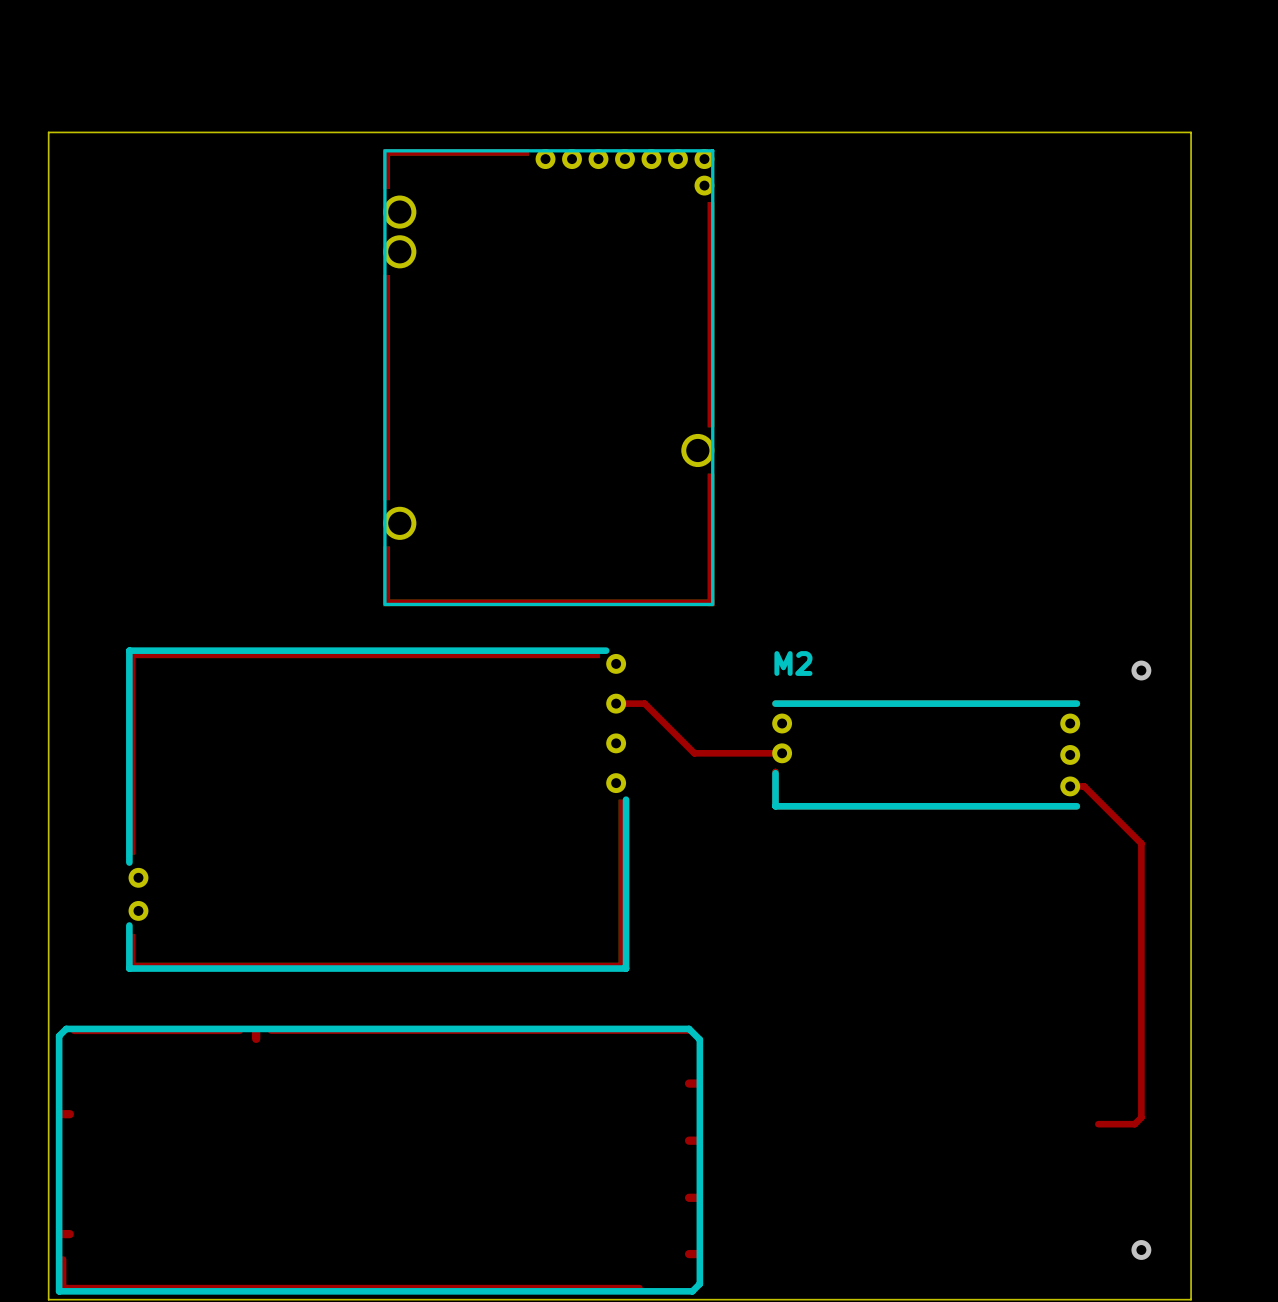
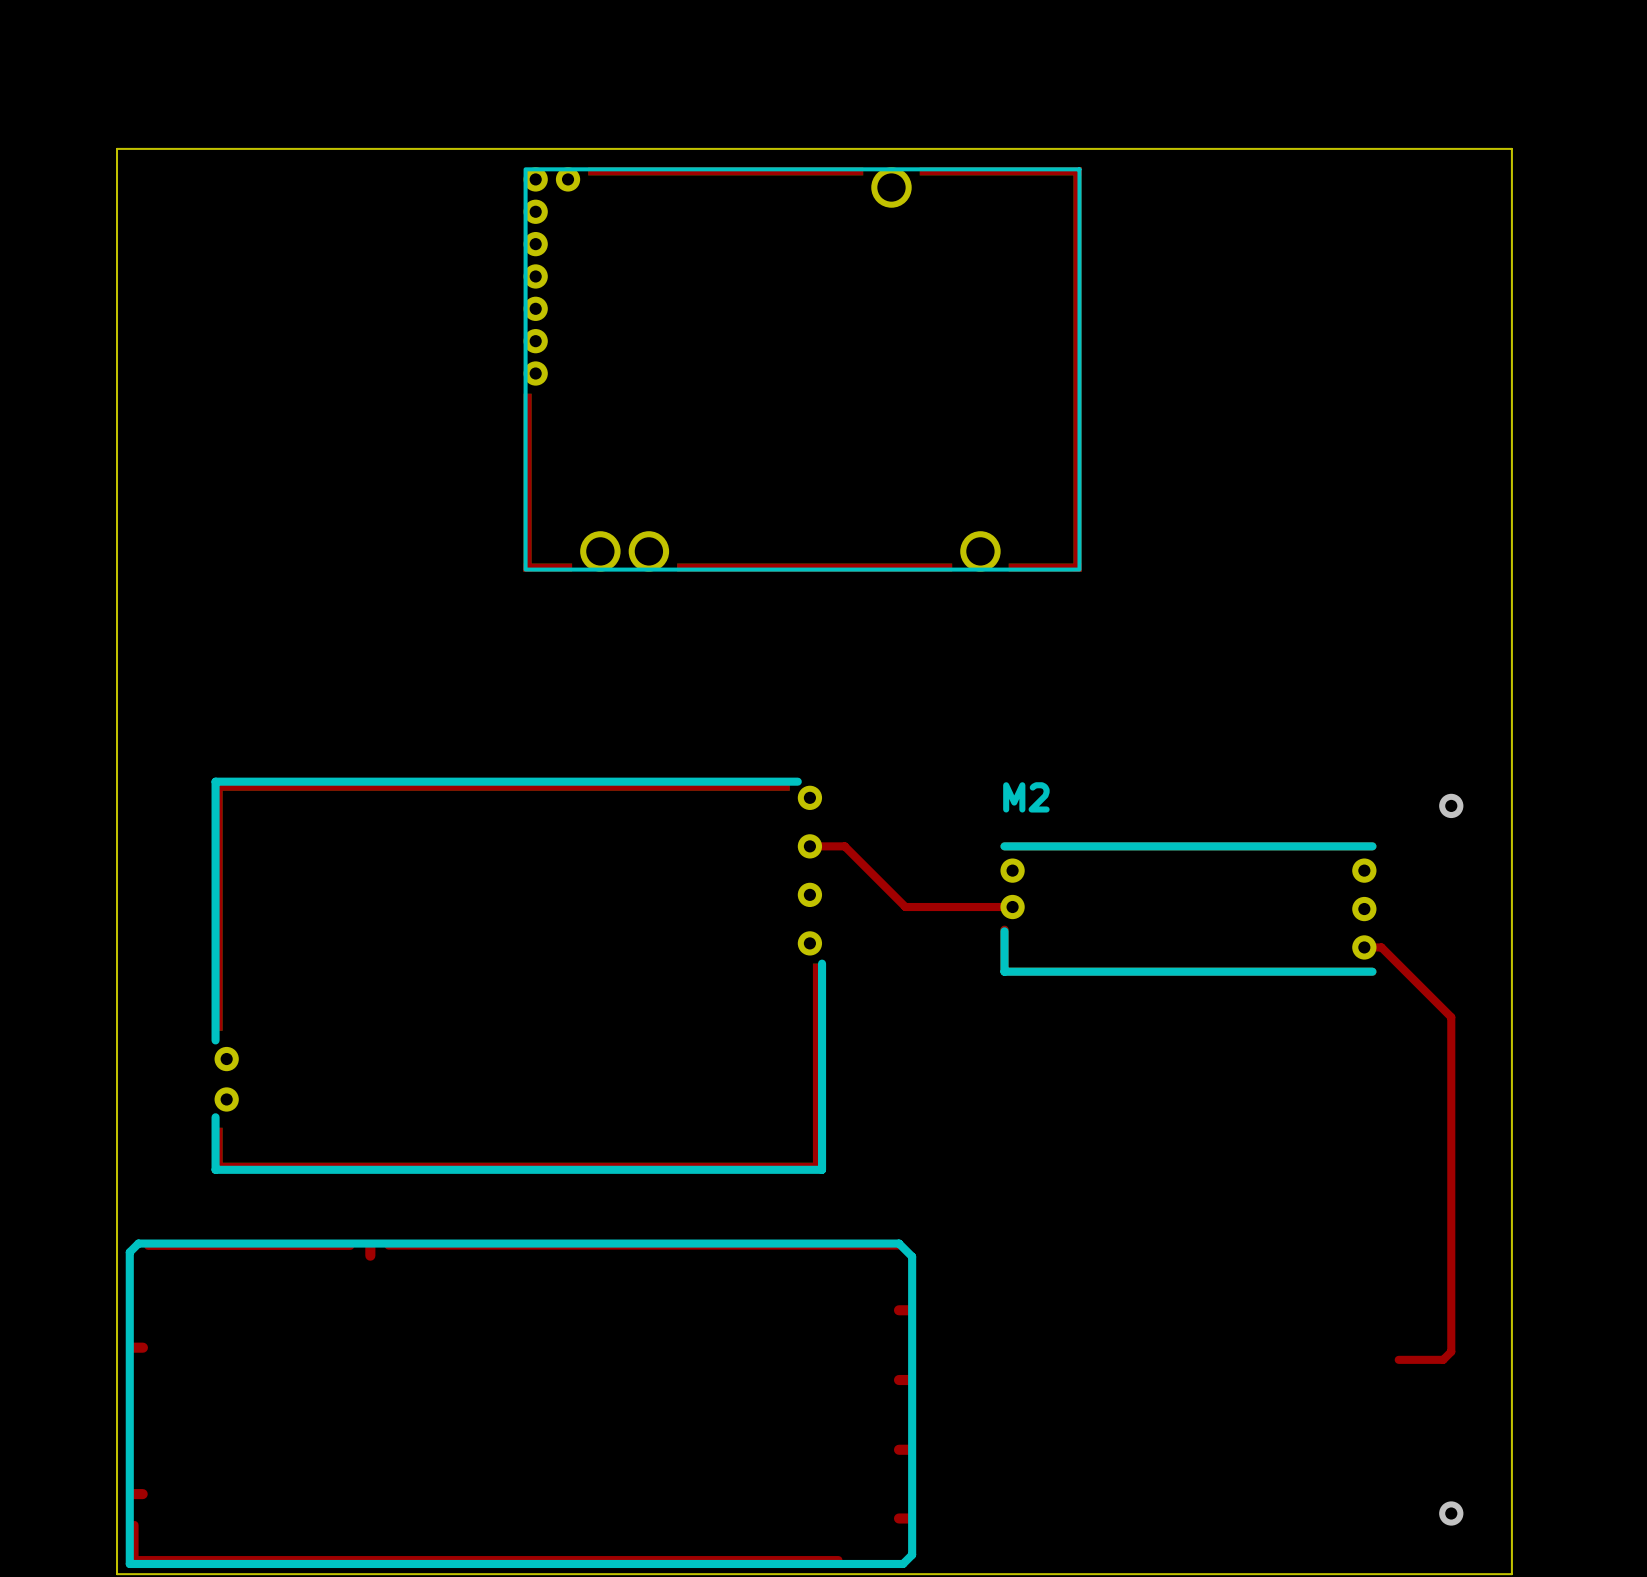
part rotation: 0° (548, 377) -> 90° counterclockwise (802, 369)

